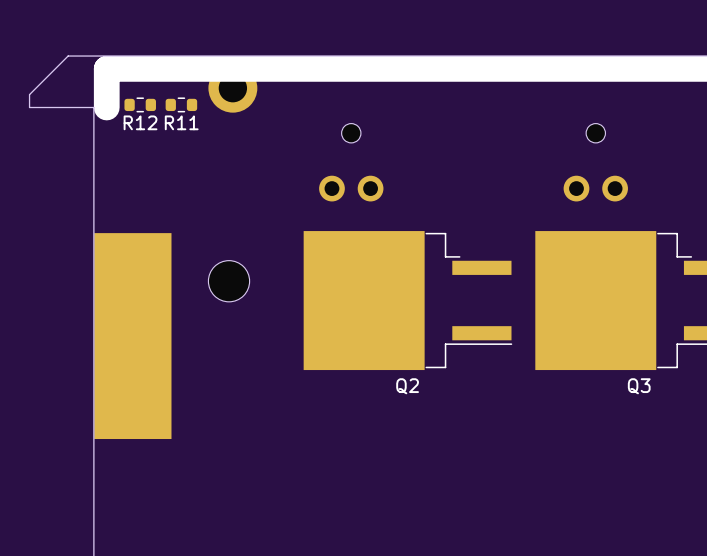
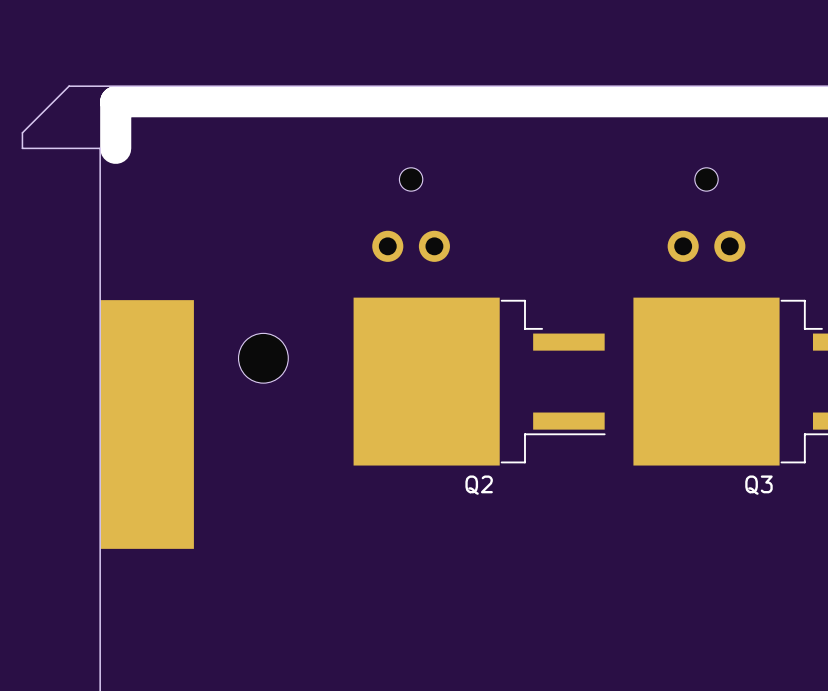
part: (232, 88) -> none
R12: (140, 104) -> none
R11: (181, 104) -> none

